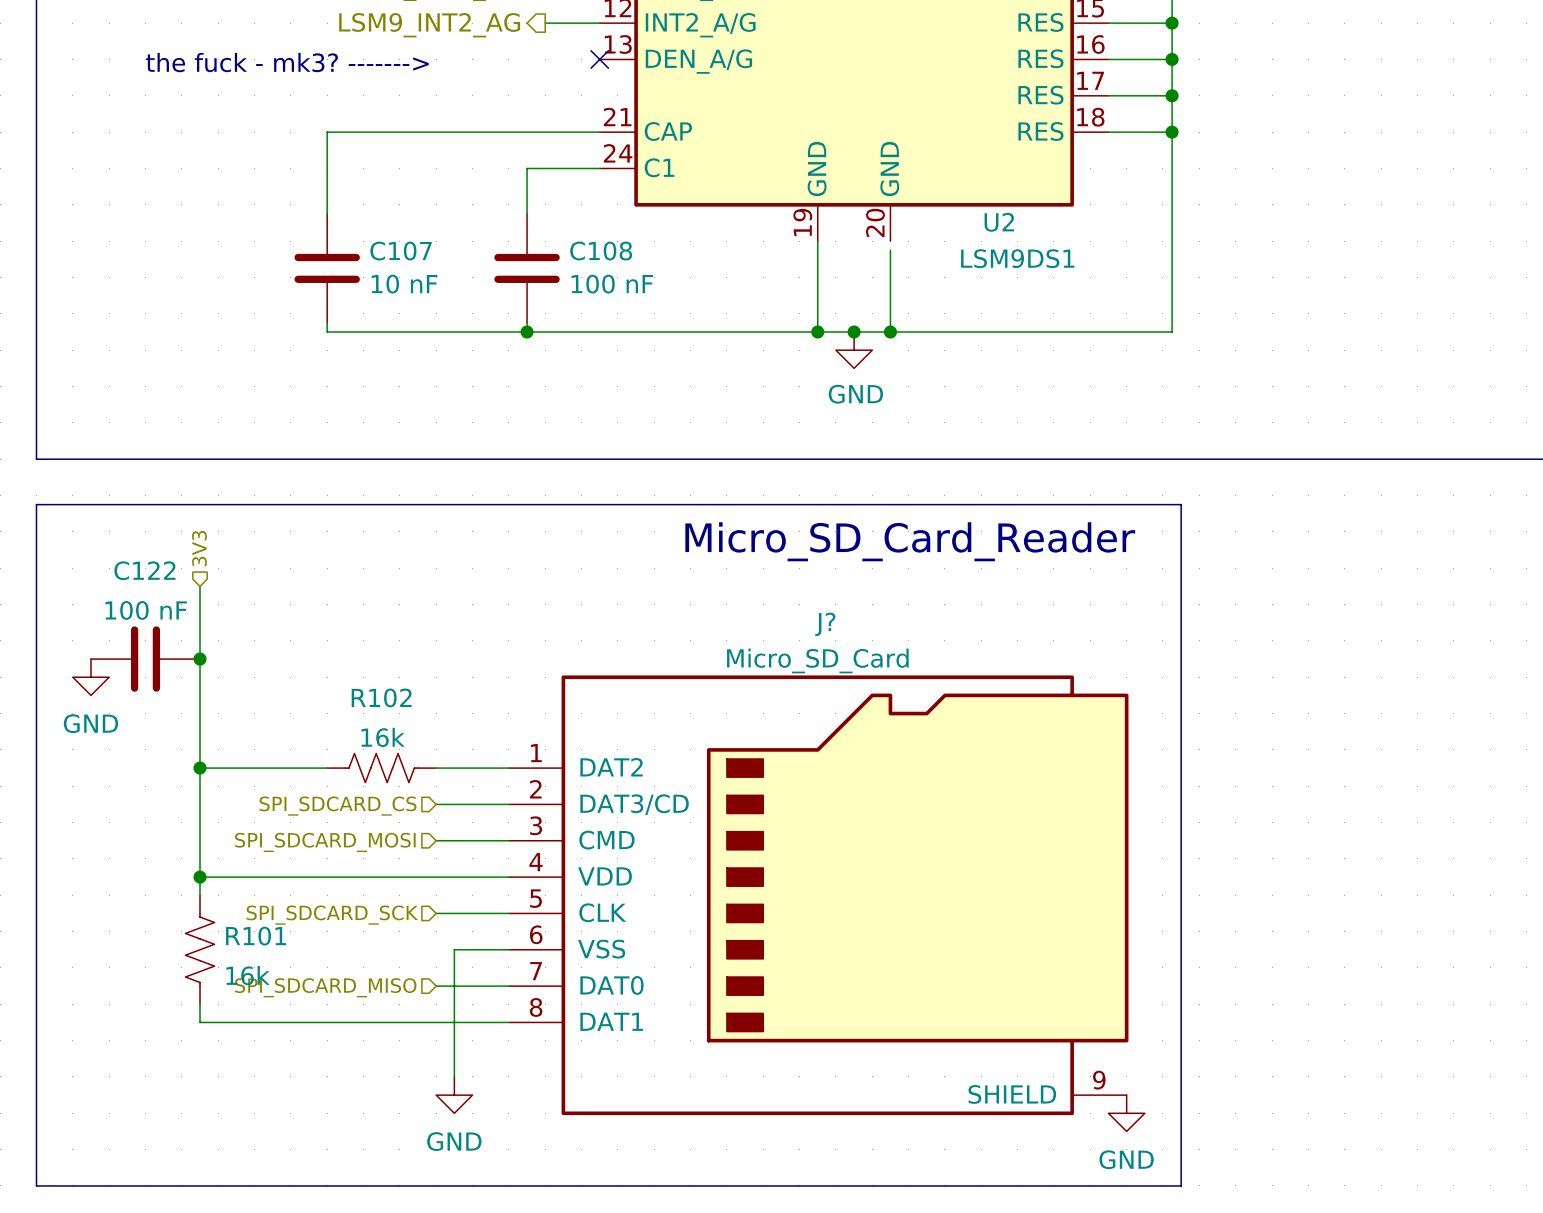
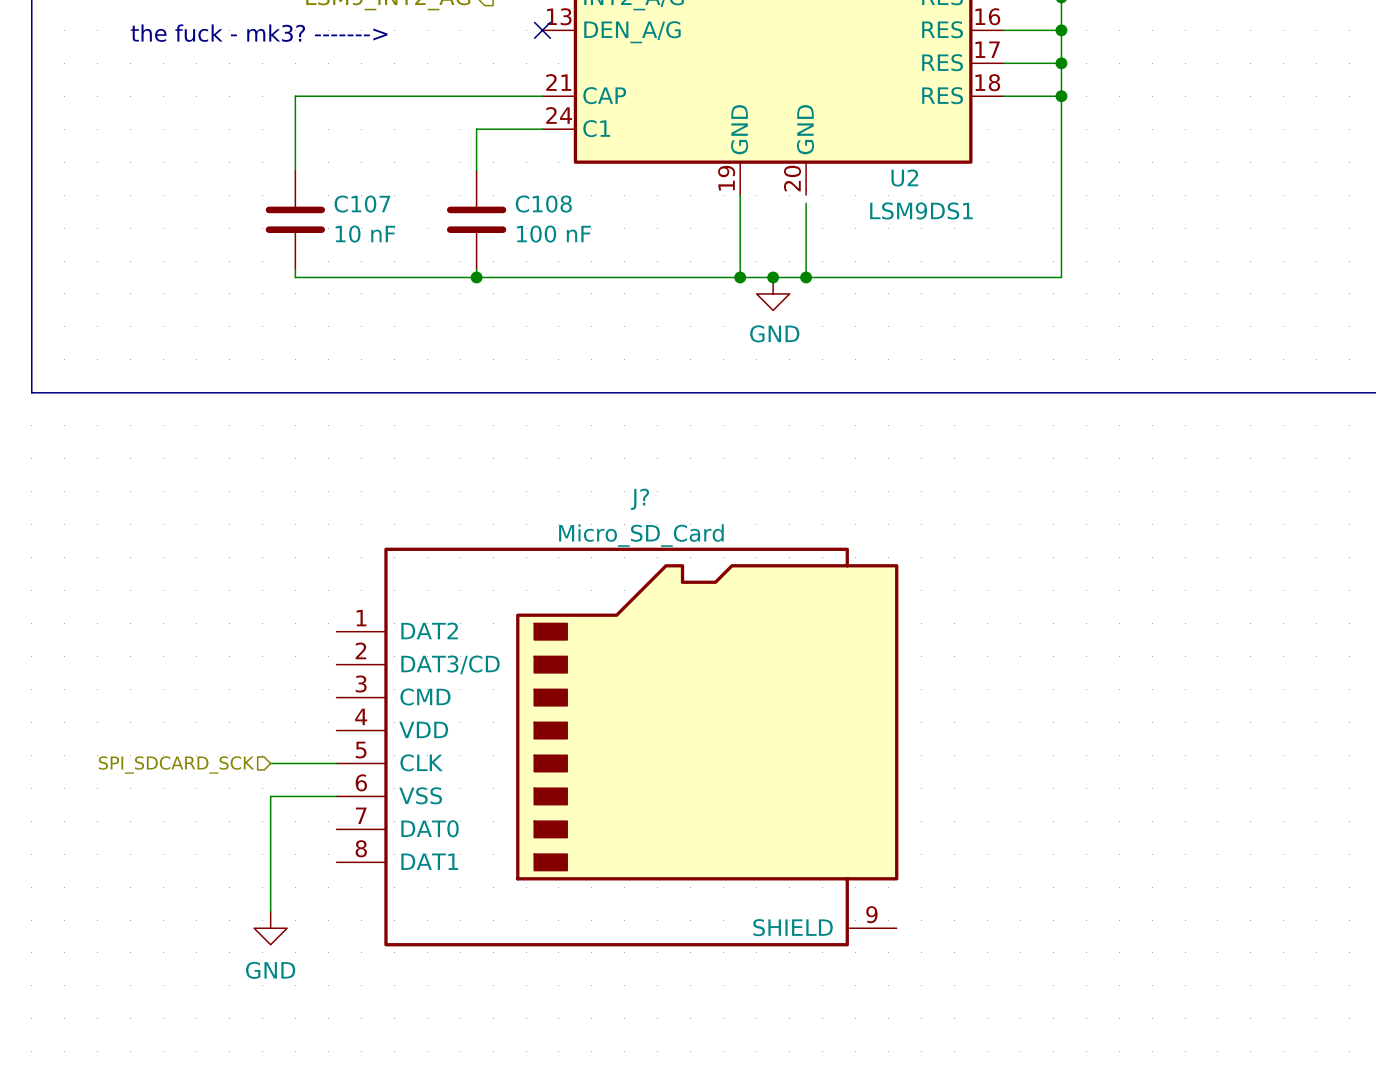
line: (36, 504) (1181, 504) (1181, 1185) (36, 1185) (36, 504) -> none
text: Micro_SD_Card_Reader (910, 541) -> none
hierarchical label: 3V3 (199, 548) -> none
wire: (200, 586) (200, 895) -> none
J? name position: J? (825, 624) -> J? (639, 499)
C122: 100 nF (145, 659) -> none
junction: (200, 659) -> none
J? value position: Micro_SD_Card (817, 660) -> Micro_SD_Card (641, 535)
power symbol: GND (90, 677) -> none
wire: (200, 768) (327, 768) -> none
junction: (200, 768) -> none
R102: 16k (381, 768) -> none
wire: (436, 768) (508, 768) -> none
wire: (436, 804) (508, 804) -> none
hierarchical label: SPI_SDCARD_CS (338, 806) -> none
wire: (436, 840) (508, 840) -> (270, 763) (336, 763)
hierarchical label: SPI_SDCARD_MOSI (325, 842) -> none
wire: (200, 877) (508, 877) -> none
junction: (200, 877) -> none
J? position: (818, 895) -> (617, 747)
wire: none -> (336, 796) (270, 796) (270, 911)
wire: (436, 913) (508, 913) -> none
hierarchical label position: SPI_SDCARD_SCK (332, 915) -> SPI_SDCARD_SCK (176, 764)
R101: 16k (200, 949) -> none
wire: (508, 949) (454, 949) (454, 1076) -> none
wire: (436, 986) (508, 986) -> none
hierarchical label: SPI_SDCARD_MISO (325, 987) -> none
wire: (200, 1004) (200, 1022) (508, 1022) -> none
power symbol position: GND (454, 1095) -> GND (270, 928)
power symbol: GND (1126, 1113) -> none

